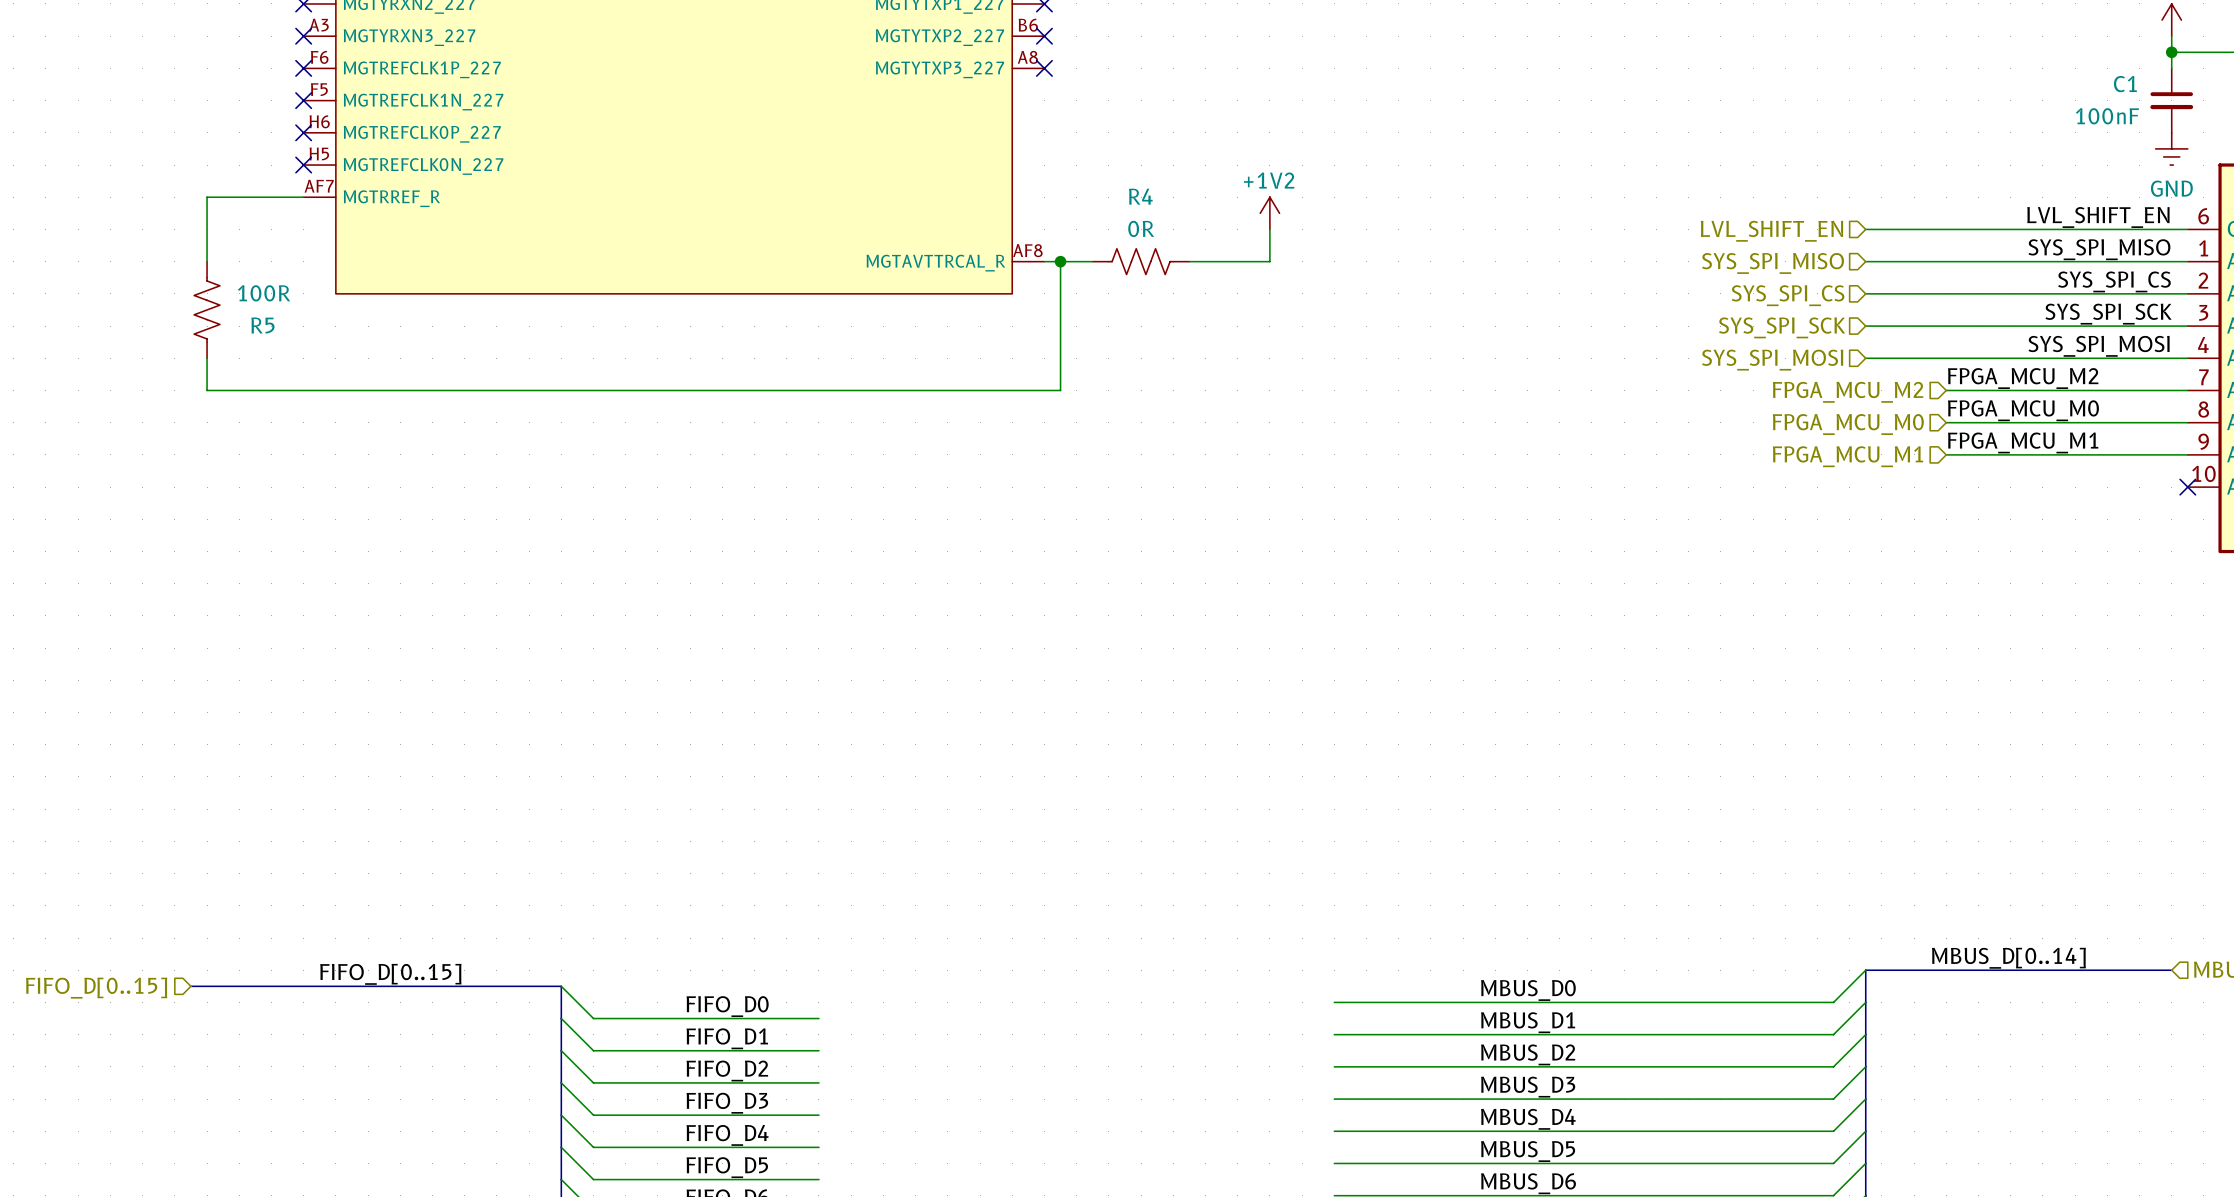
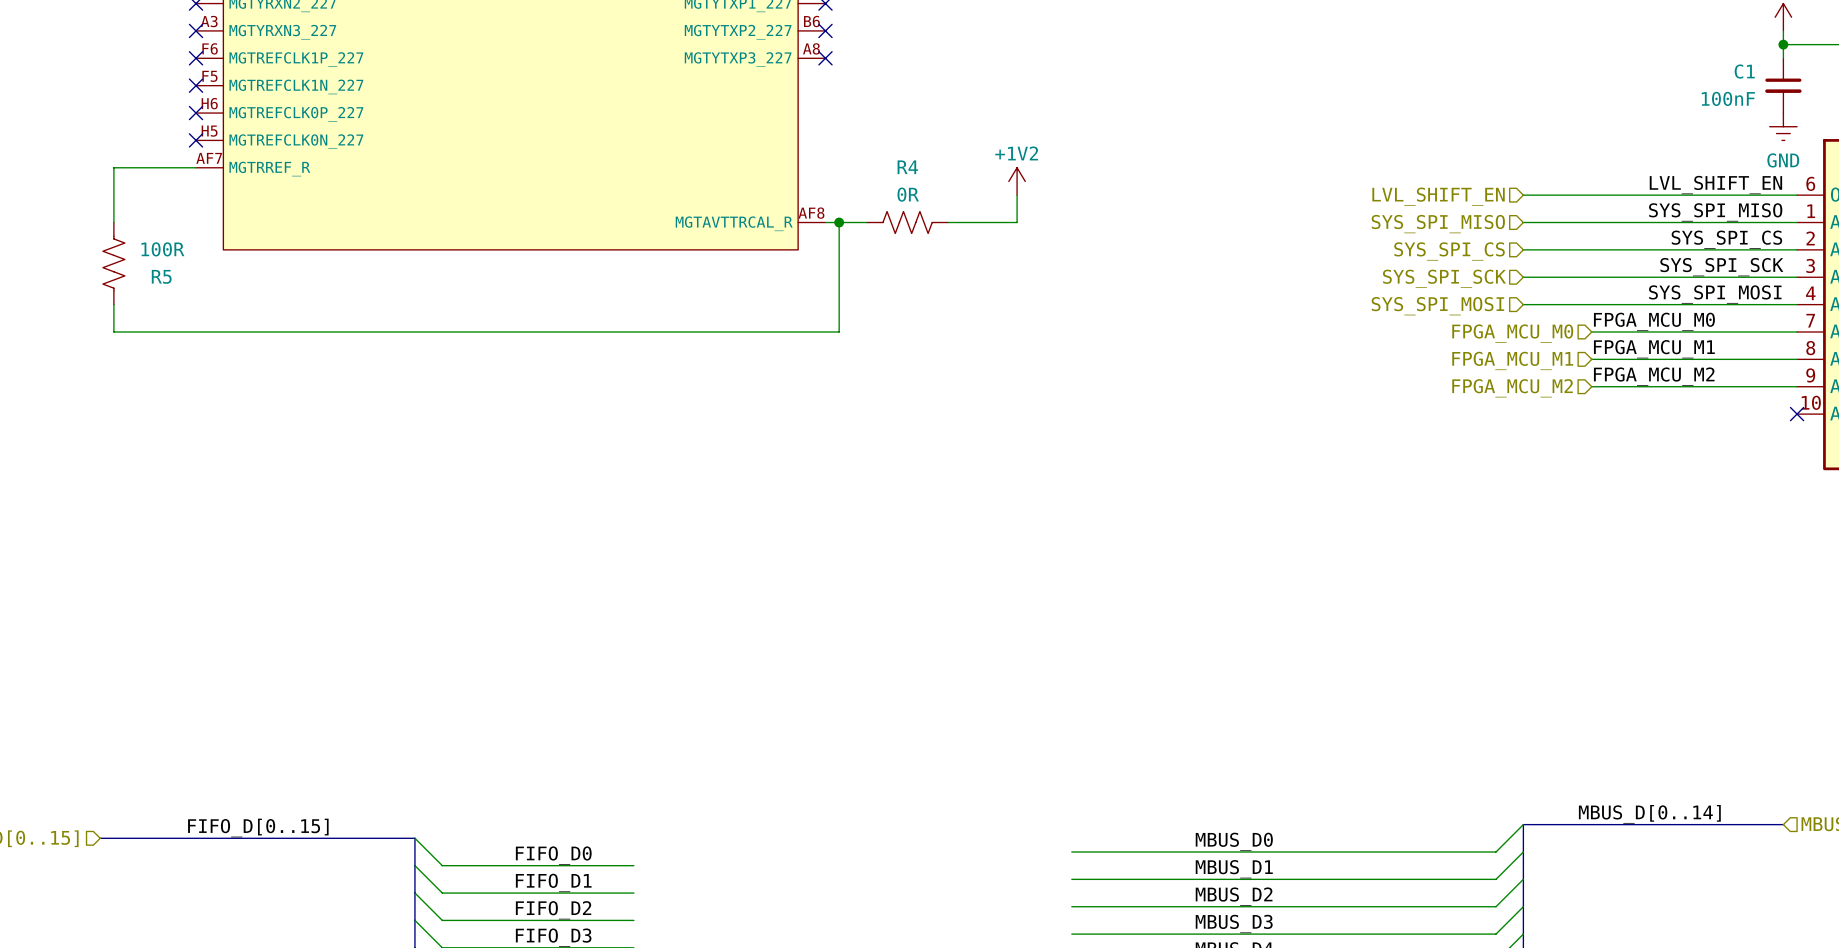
label: FPGA_MCU_M2 (2023, 378) -> FPGA_MCU_M0 (1654, 321)
hierarchical label: FPGA_MCU_M2 (1848, 392) -> FPGA_MCU_M0 (1512, 333)
label: FPGA_MCU_M0 (2023, 410) -> FPGA_MCU_M1 (1654, 349)
hierarchical label: FPGA_MCU_M0 (1848, 424) -> FPGA_MCU_M1 (1512, 360)
label: FPGA_MCU_M1 (2023, 442) -> FPGA_MCU_M2 (1654, 376)
hierarchical label: FPGA_MCU_M1 (1847, 456) -> FPGA_MCU_M2 (1512, 388)

